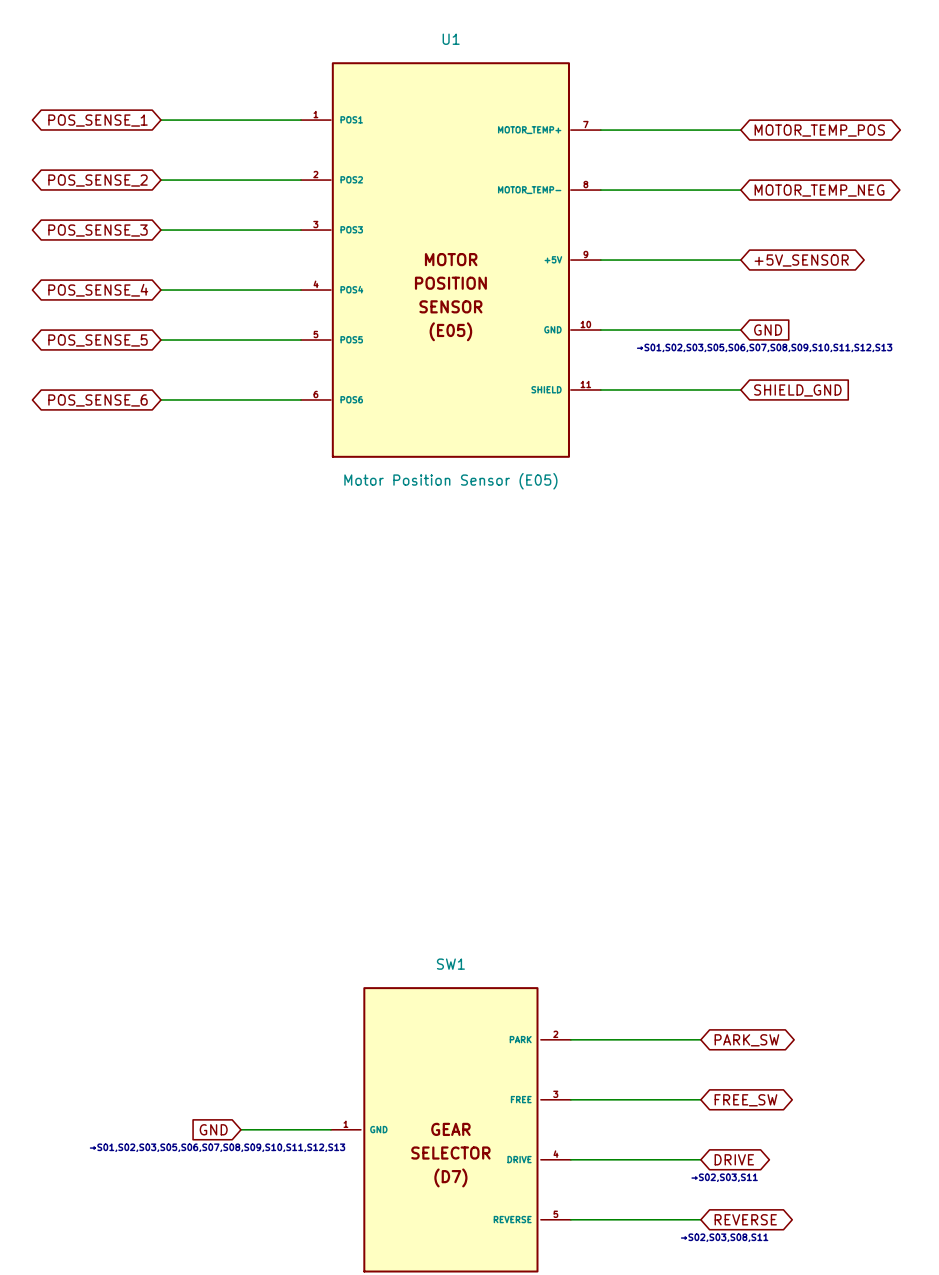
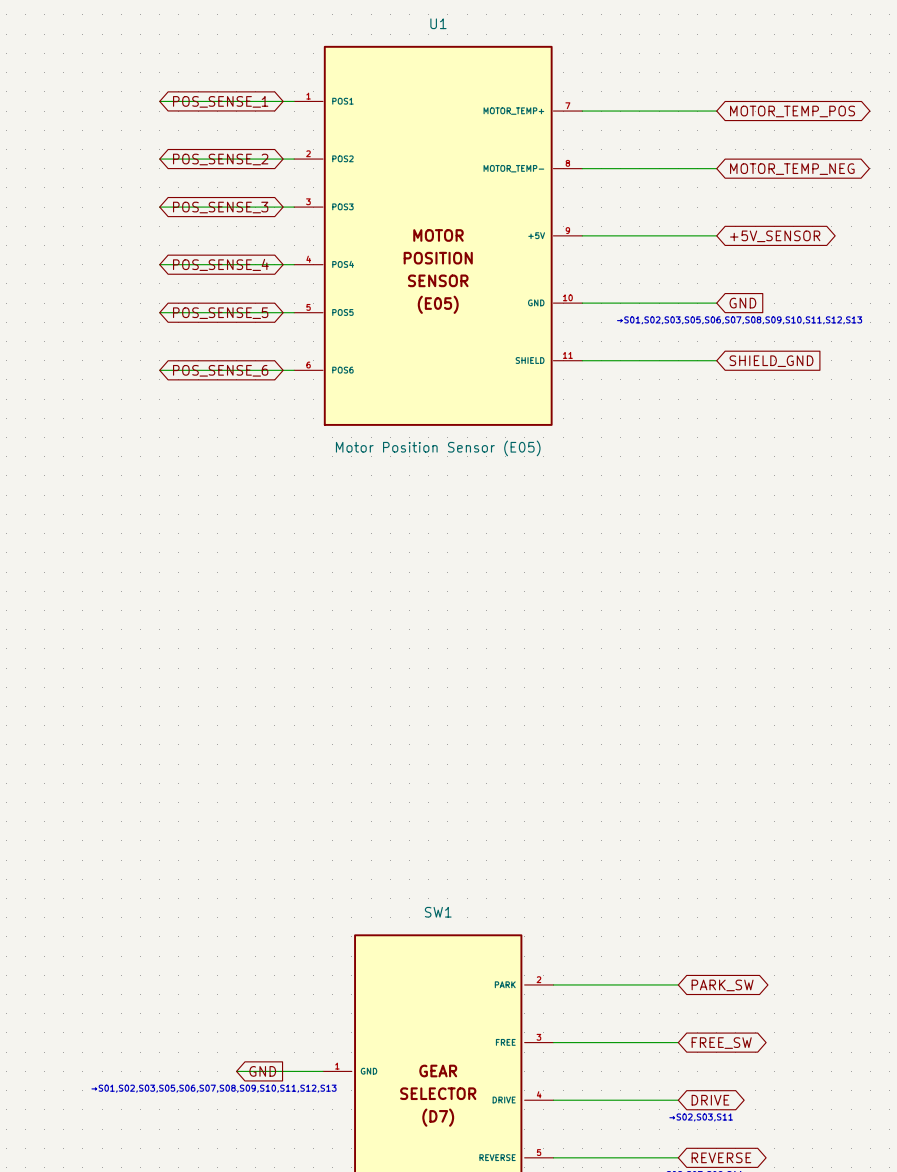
global label rotation: 0° (98, 120) -> 180° (220, 101)
global label rotation: 0° (98, 180) -> 180° (220, 159)
global label rotation: 0° (98, 230) -> 180° (220, 207)
global label rotation: 0° (98, 290) -> 180° (220, 264)
global label rotation: 0° (98, 340) -> 180° (220, 313)
global label rotation: 0° (98, 400) -> 180° (220, 370)
global label rotation: 0° (213, 1129) -> 180° (262, 1071)

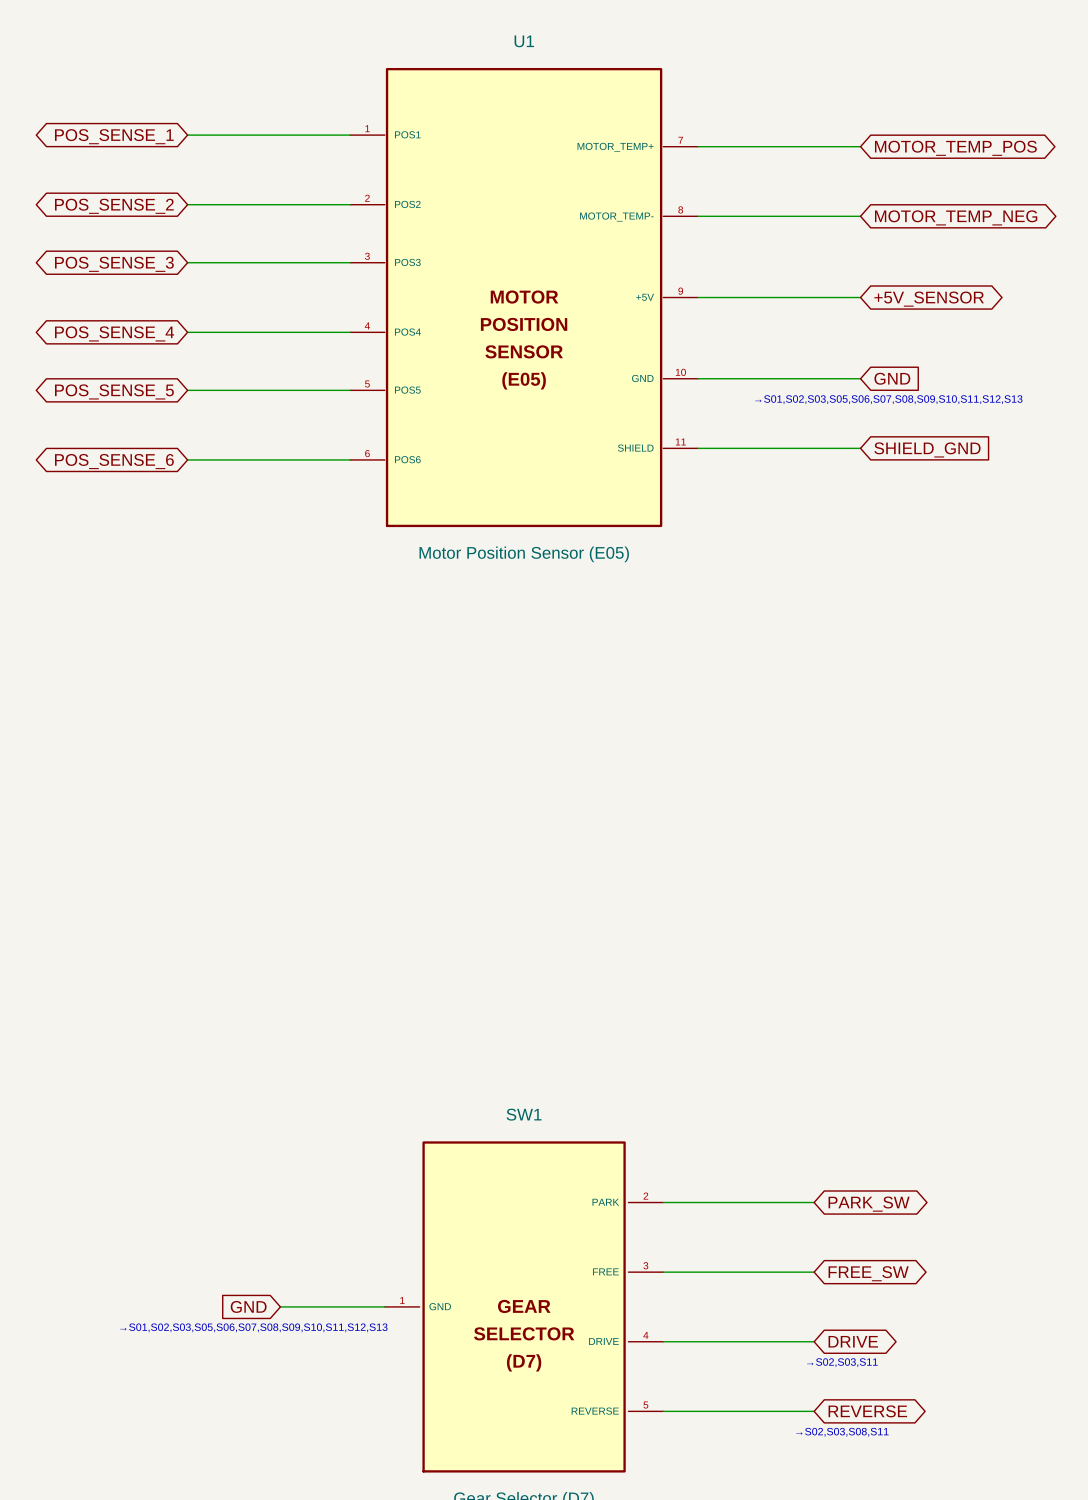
global label rotation: 0° (220, 101) -> 180° (114, 136)
global label rotation: 0° (220, 159) -> 180° (114, 206)
global label rotation: 0° (220, 207) -> 180° (114, 264)
global label rotation: 0° (220, 264) -> 180° (114, 333)
global label rotation: 0° (220, 313) -> 180° (114, 391)
global label rotation: 0° (220, 370) -> 180° (114, 461)
global label rotation: 0° (262, 1071) -> 180° (248, 1306)

